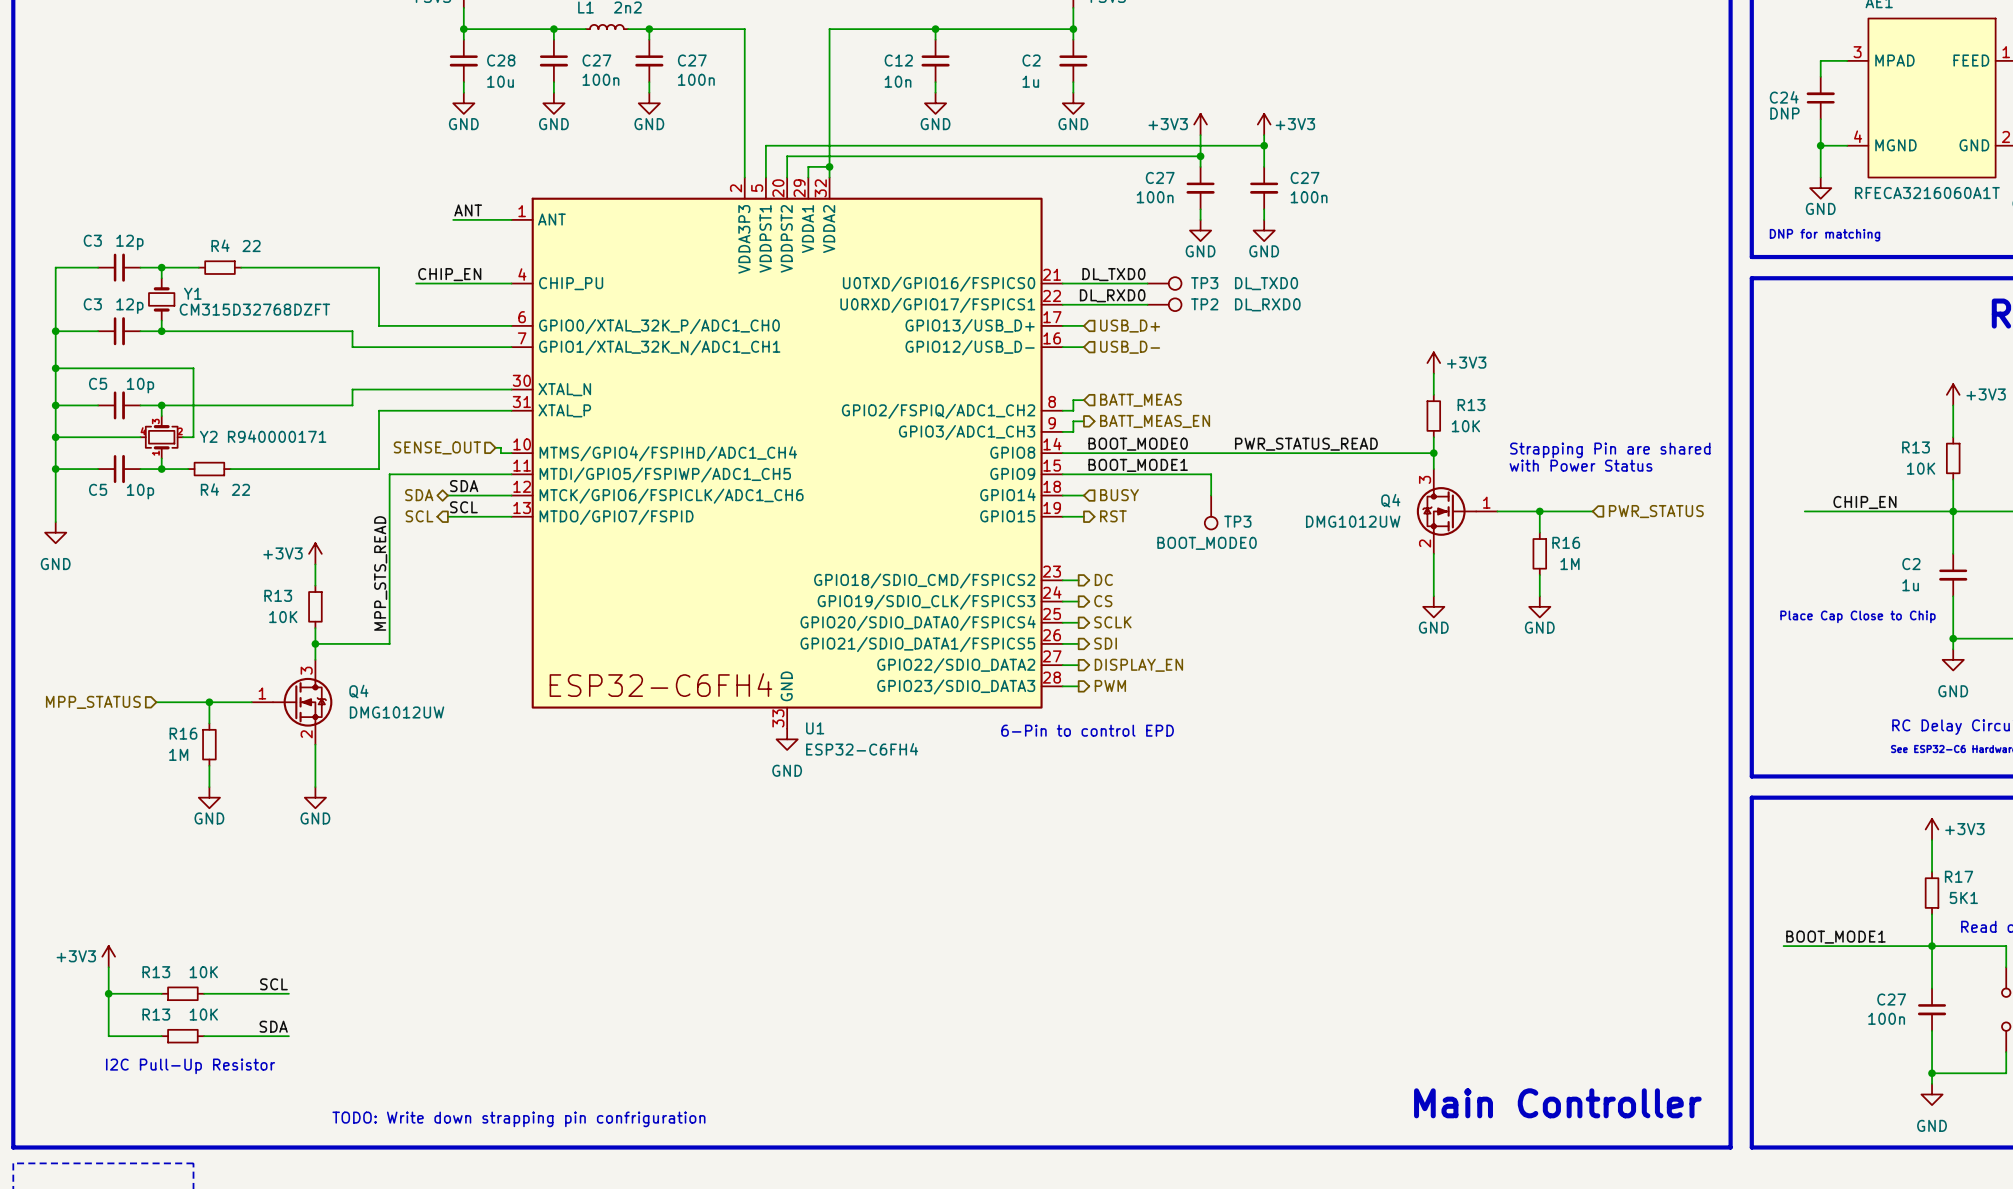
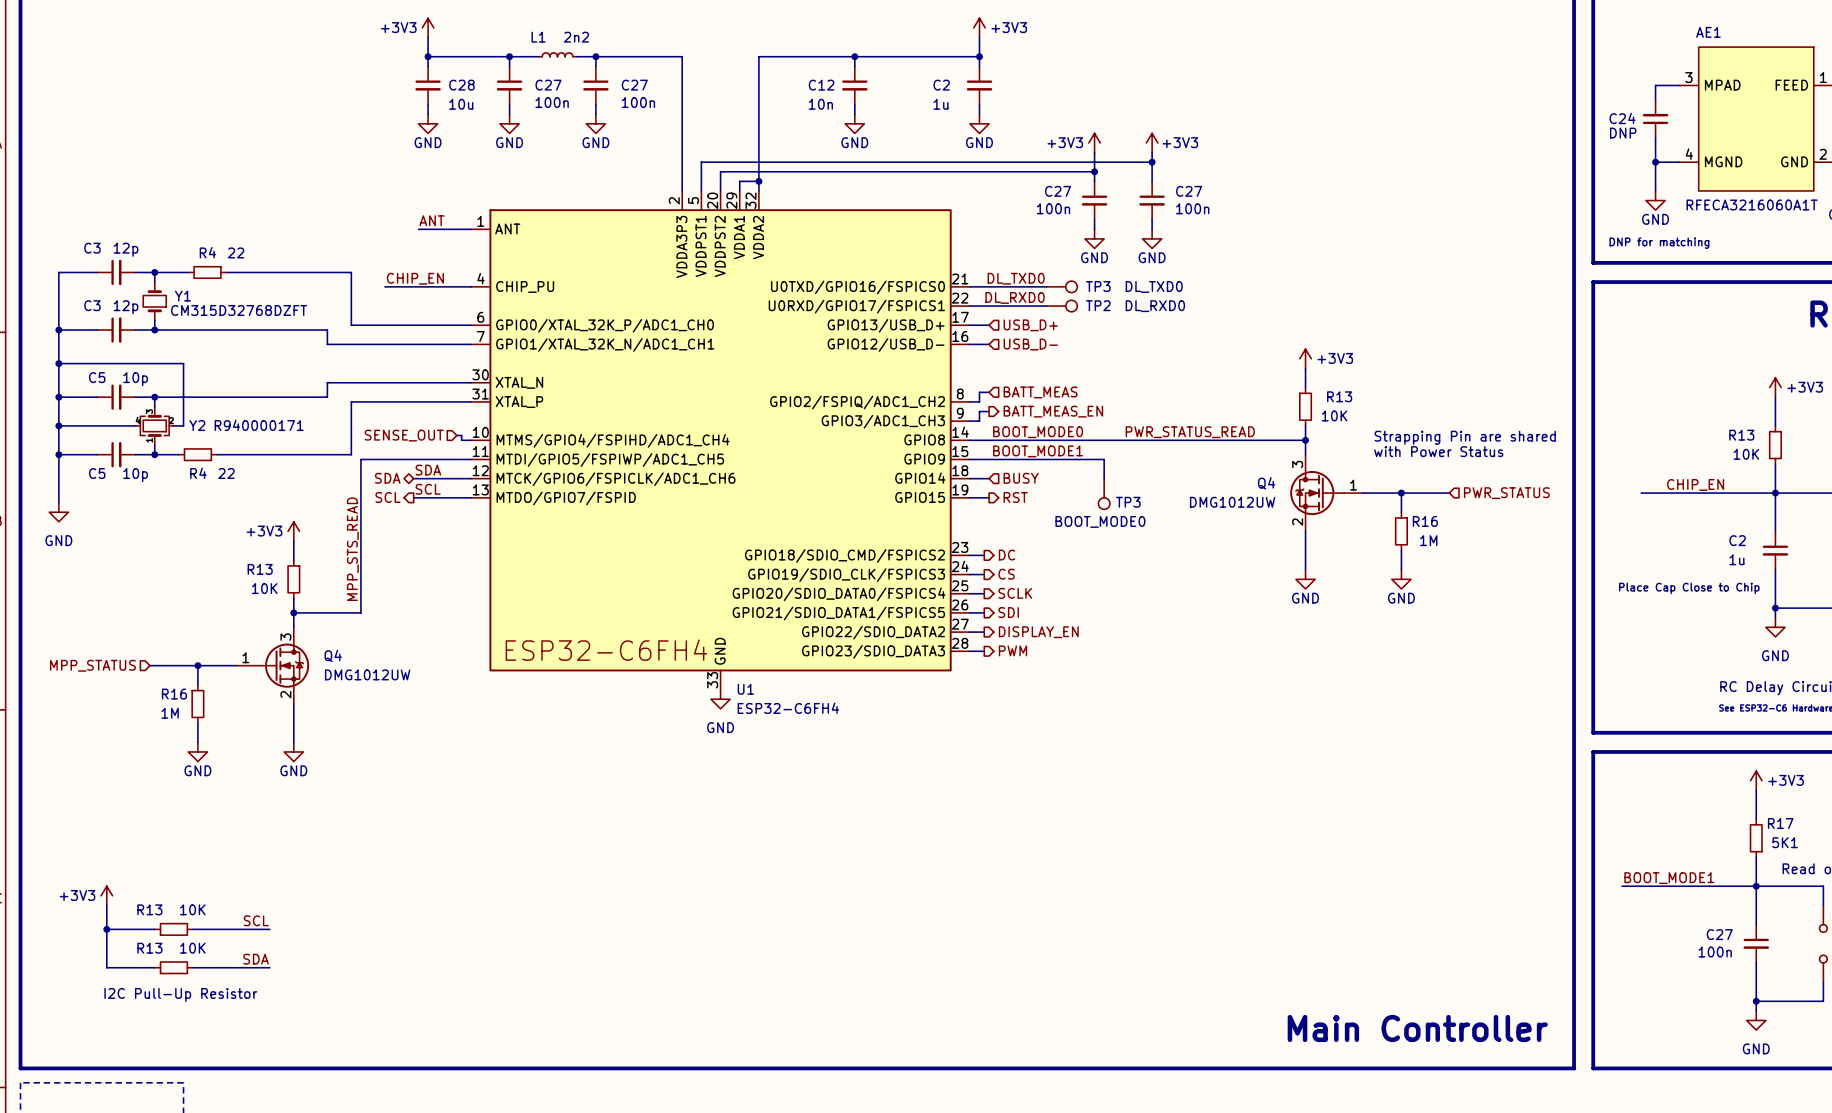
text: 6-Pin to control EPD (1087, 730) -> none
text: TODO: Write down strapping pin confriguration (518, 1119) -> none

